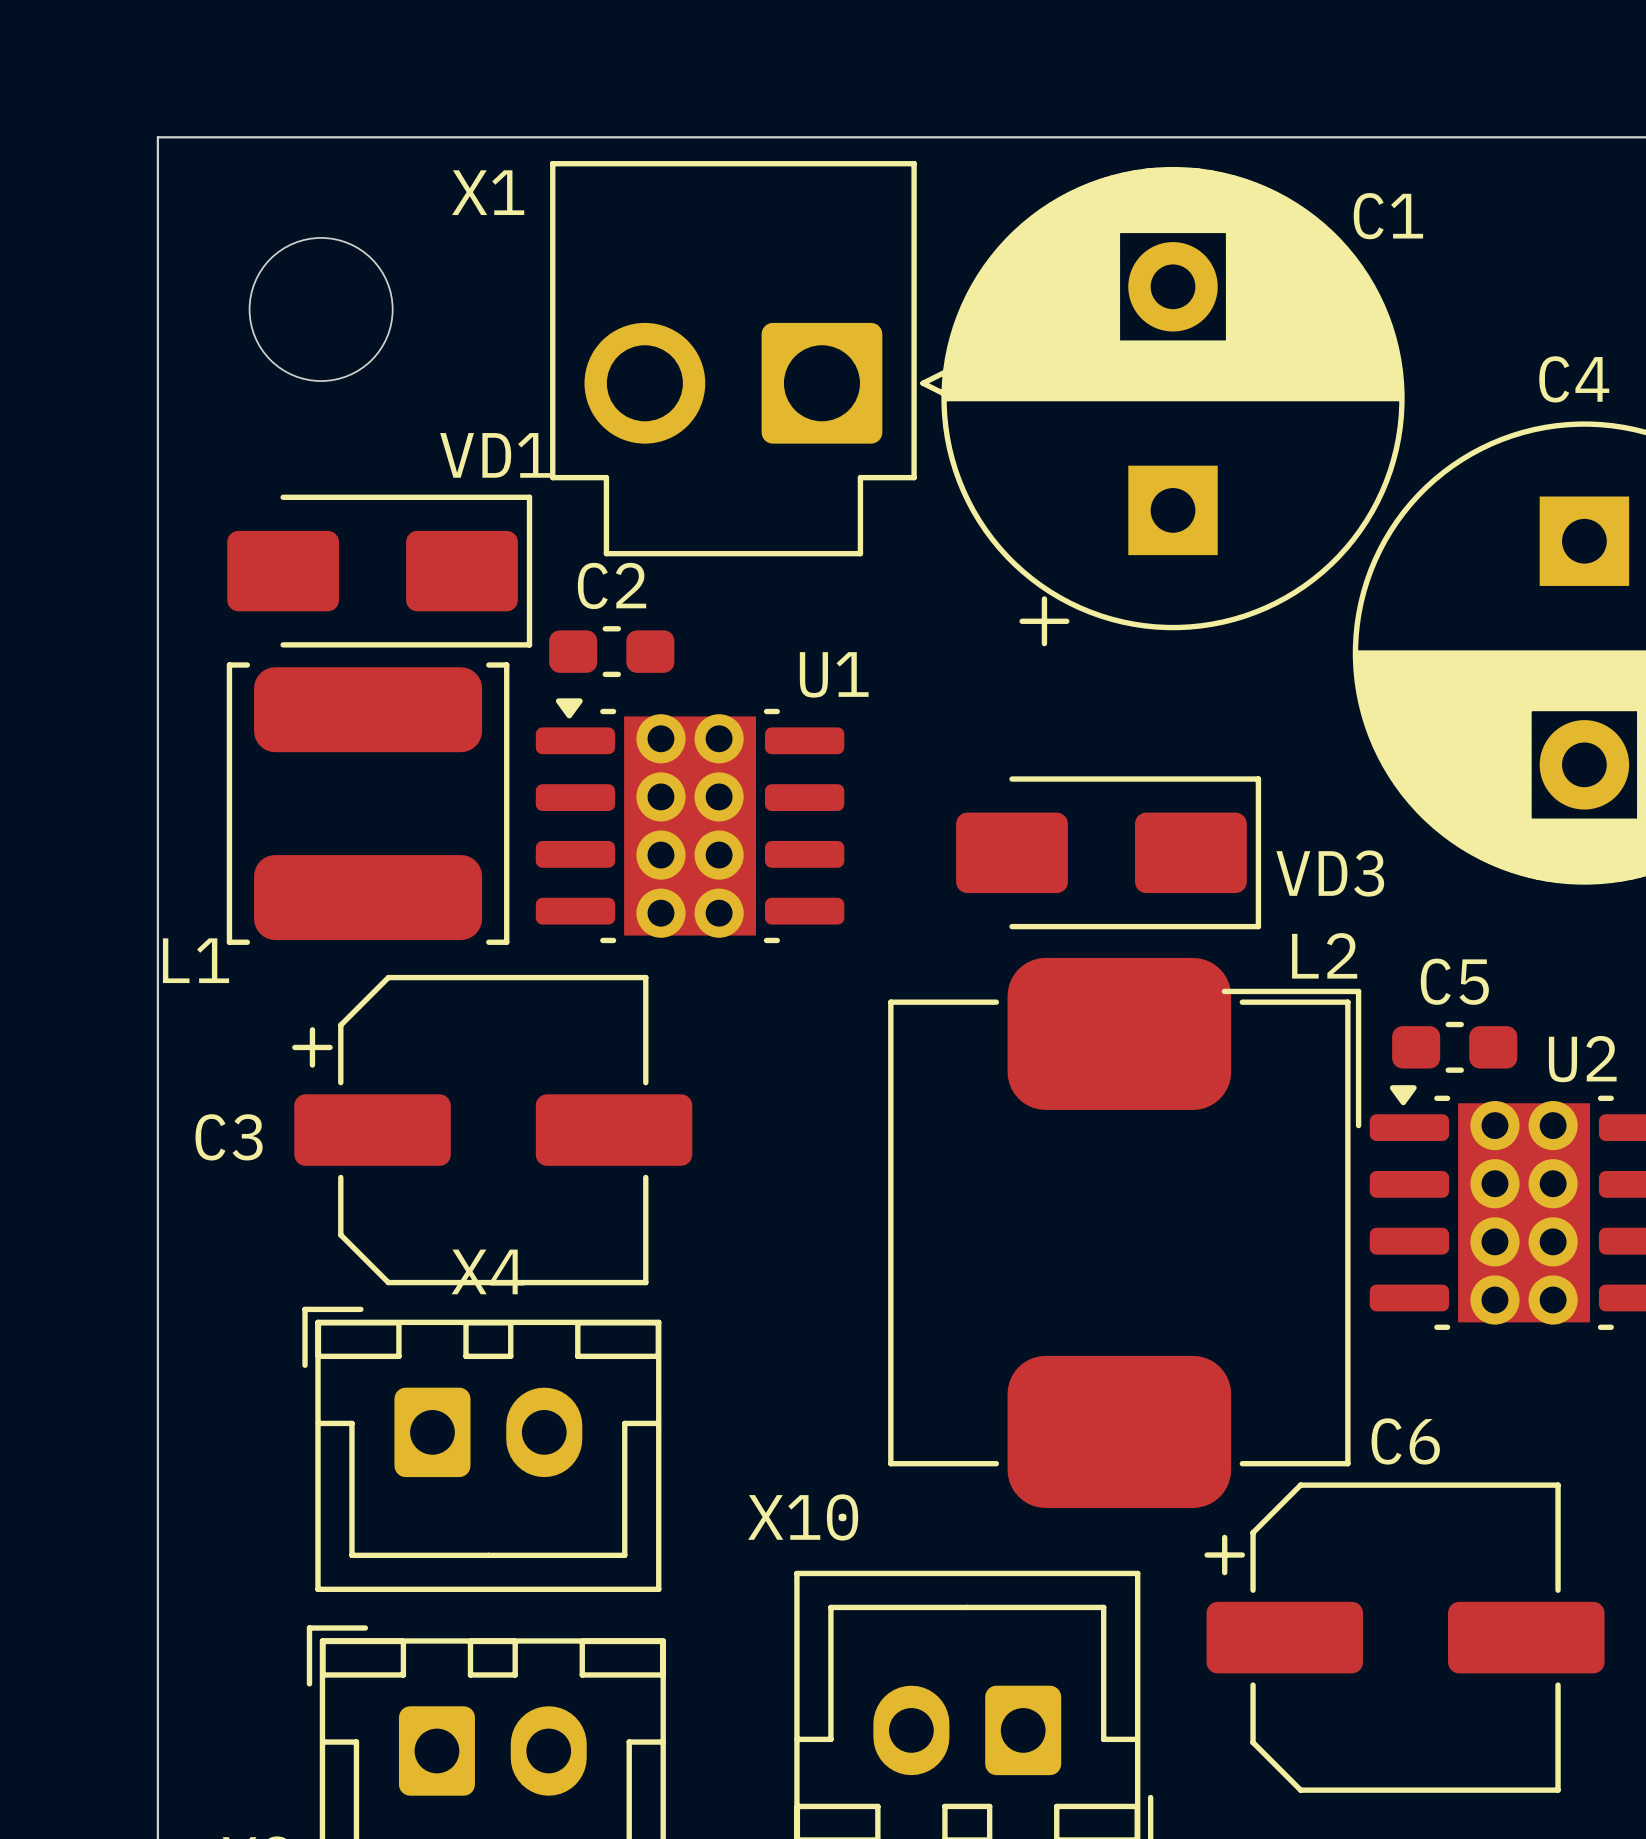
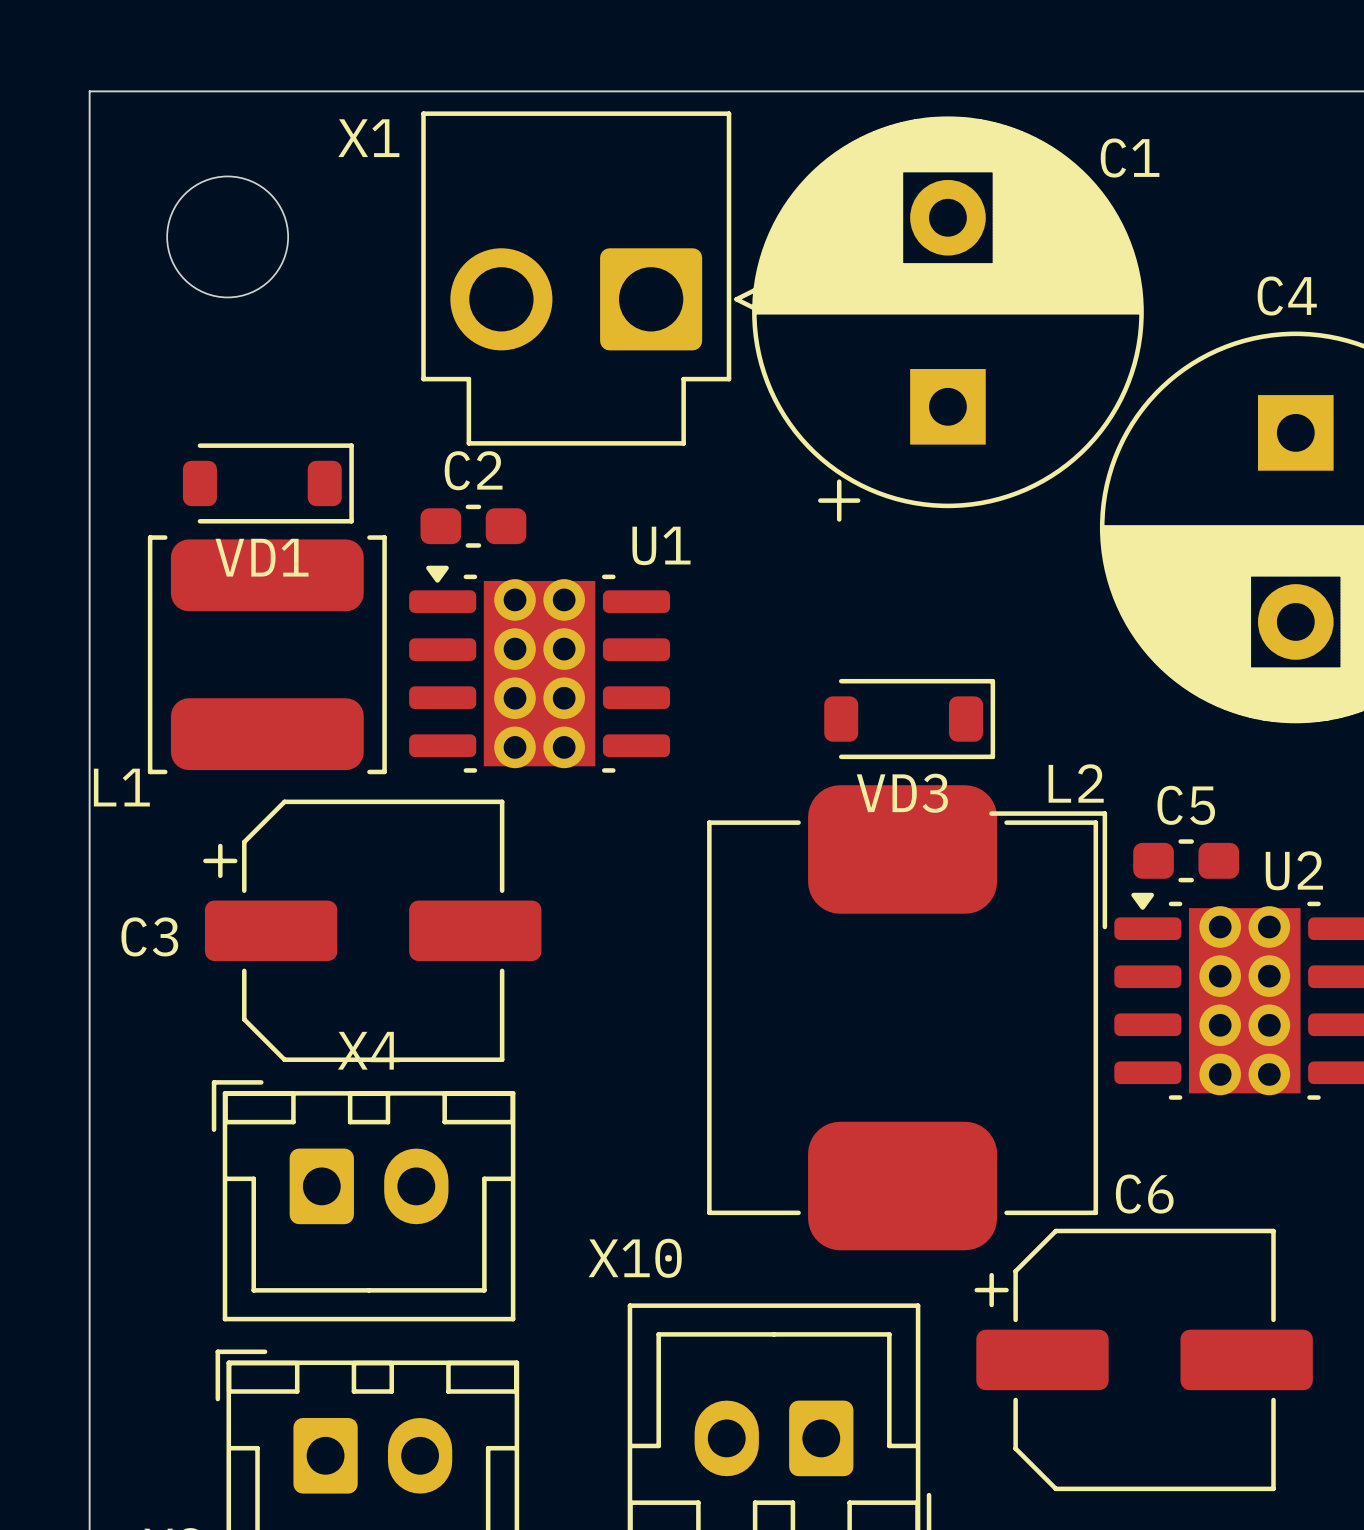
VD1 name position: VD1 (495, 455) -> VD1 (262, 557)
VD1 footprint: [227, 494, 533, 648] -> [182, 443, 354, 524]
VD3 footprint: [956, 776, 1262, 930] -> [824, 678, 996, 760]
VD3 name position: VD3 (1330, 873) -> VD3 (902, 793)

